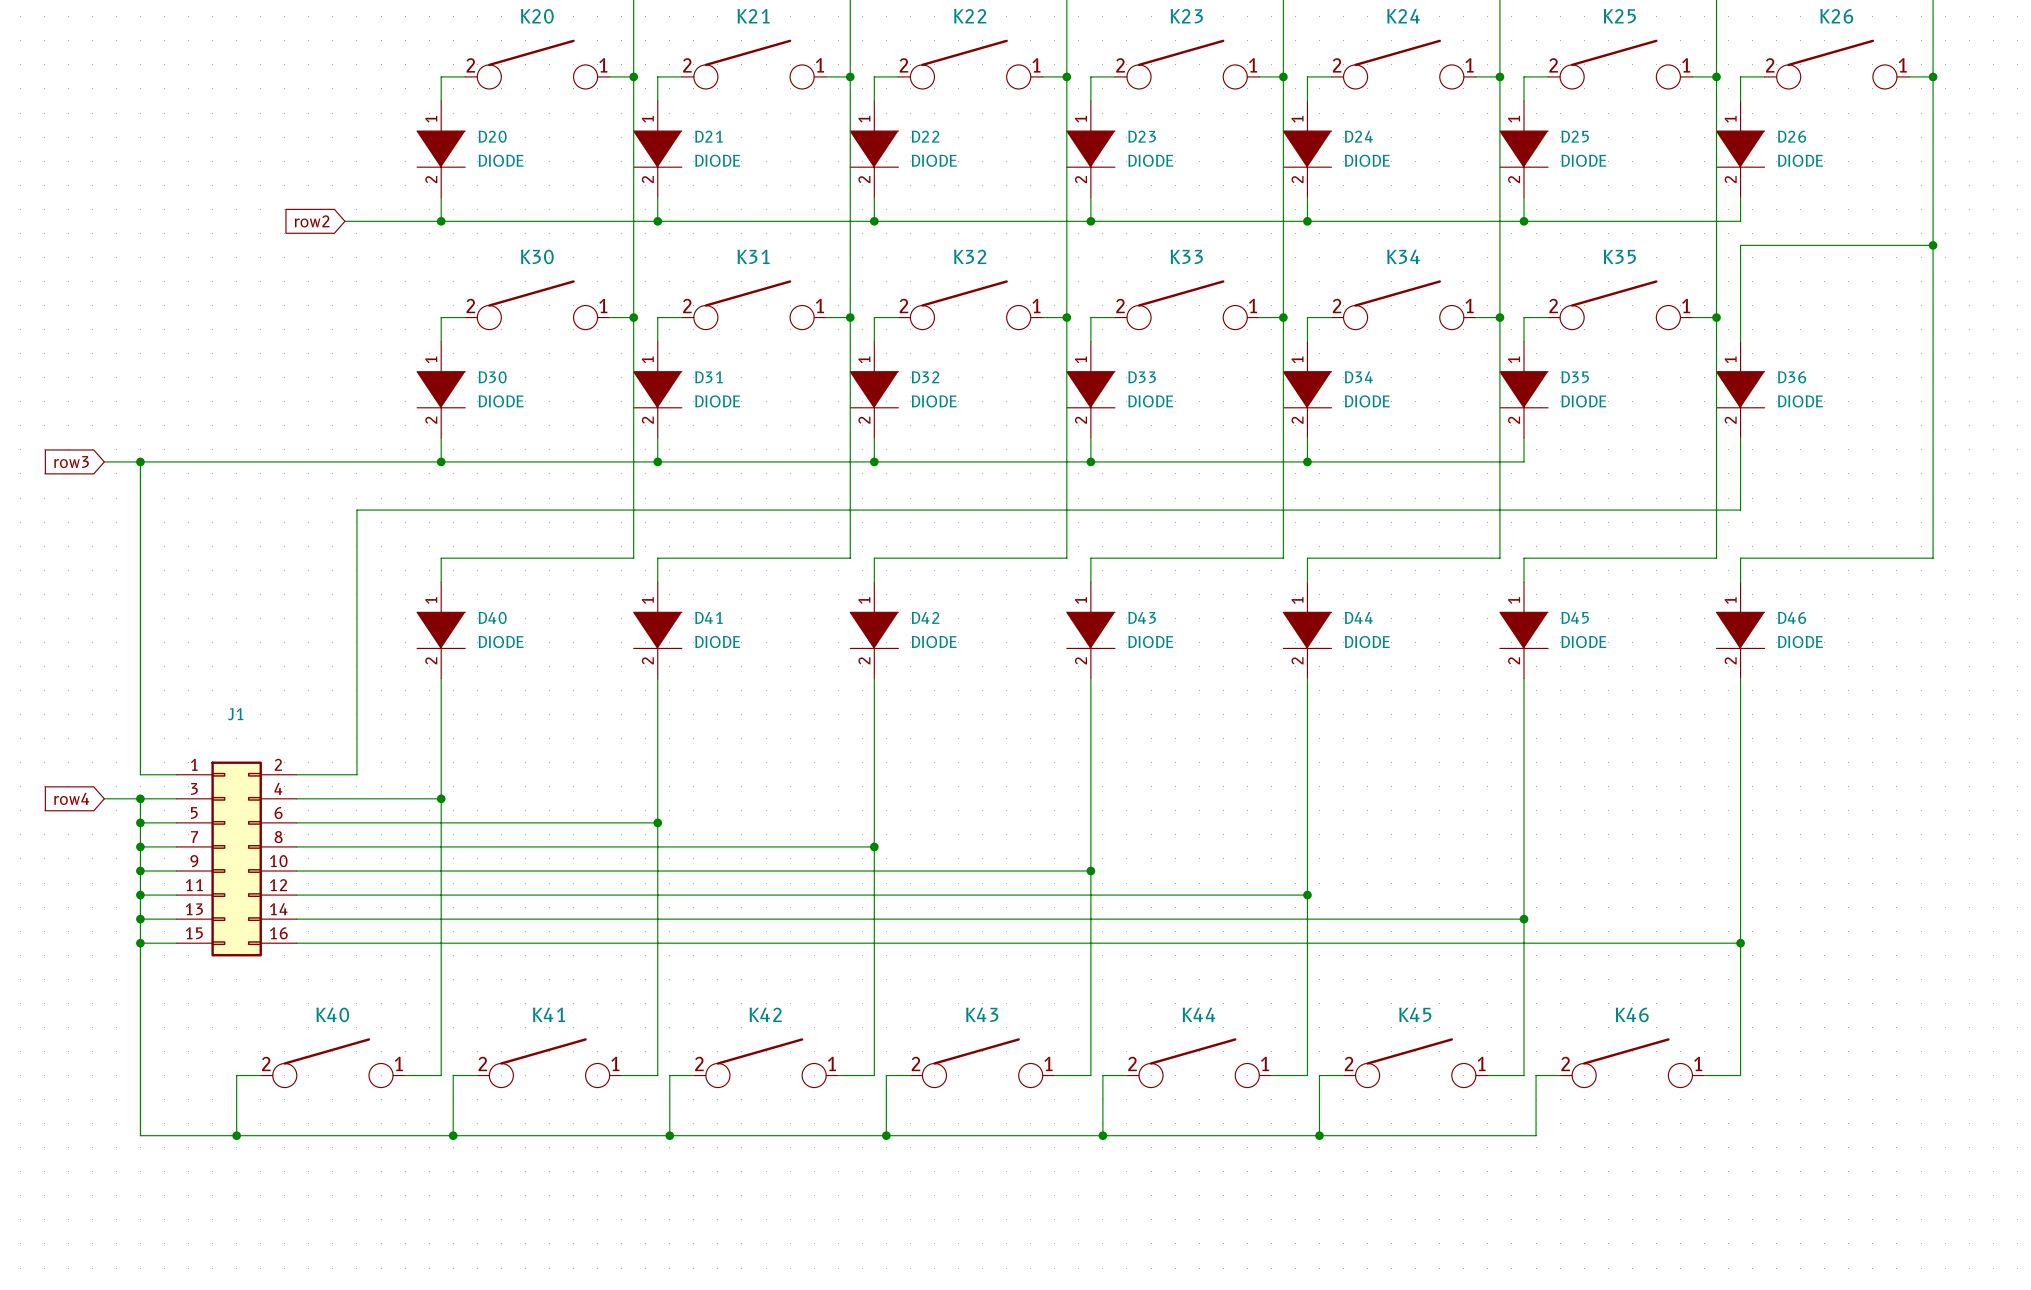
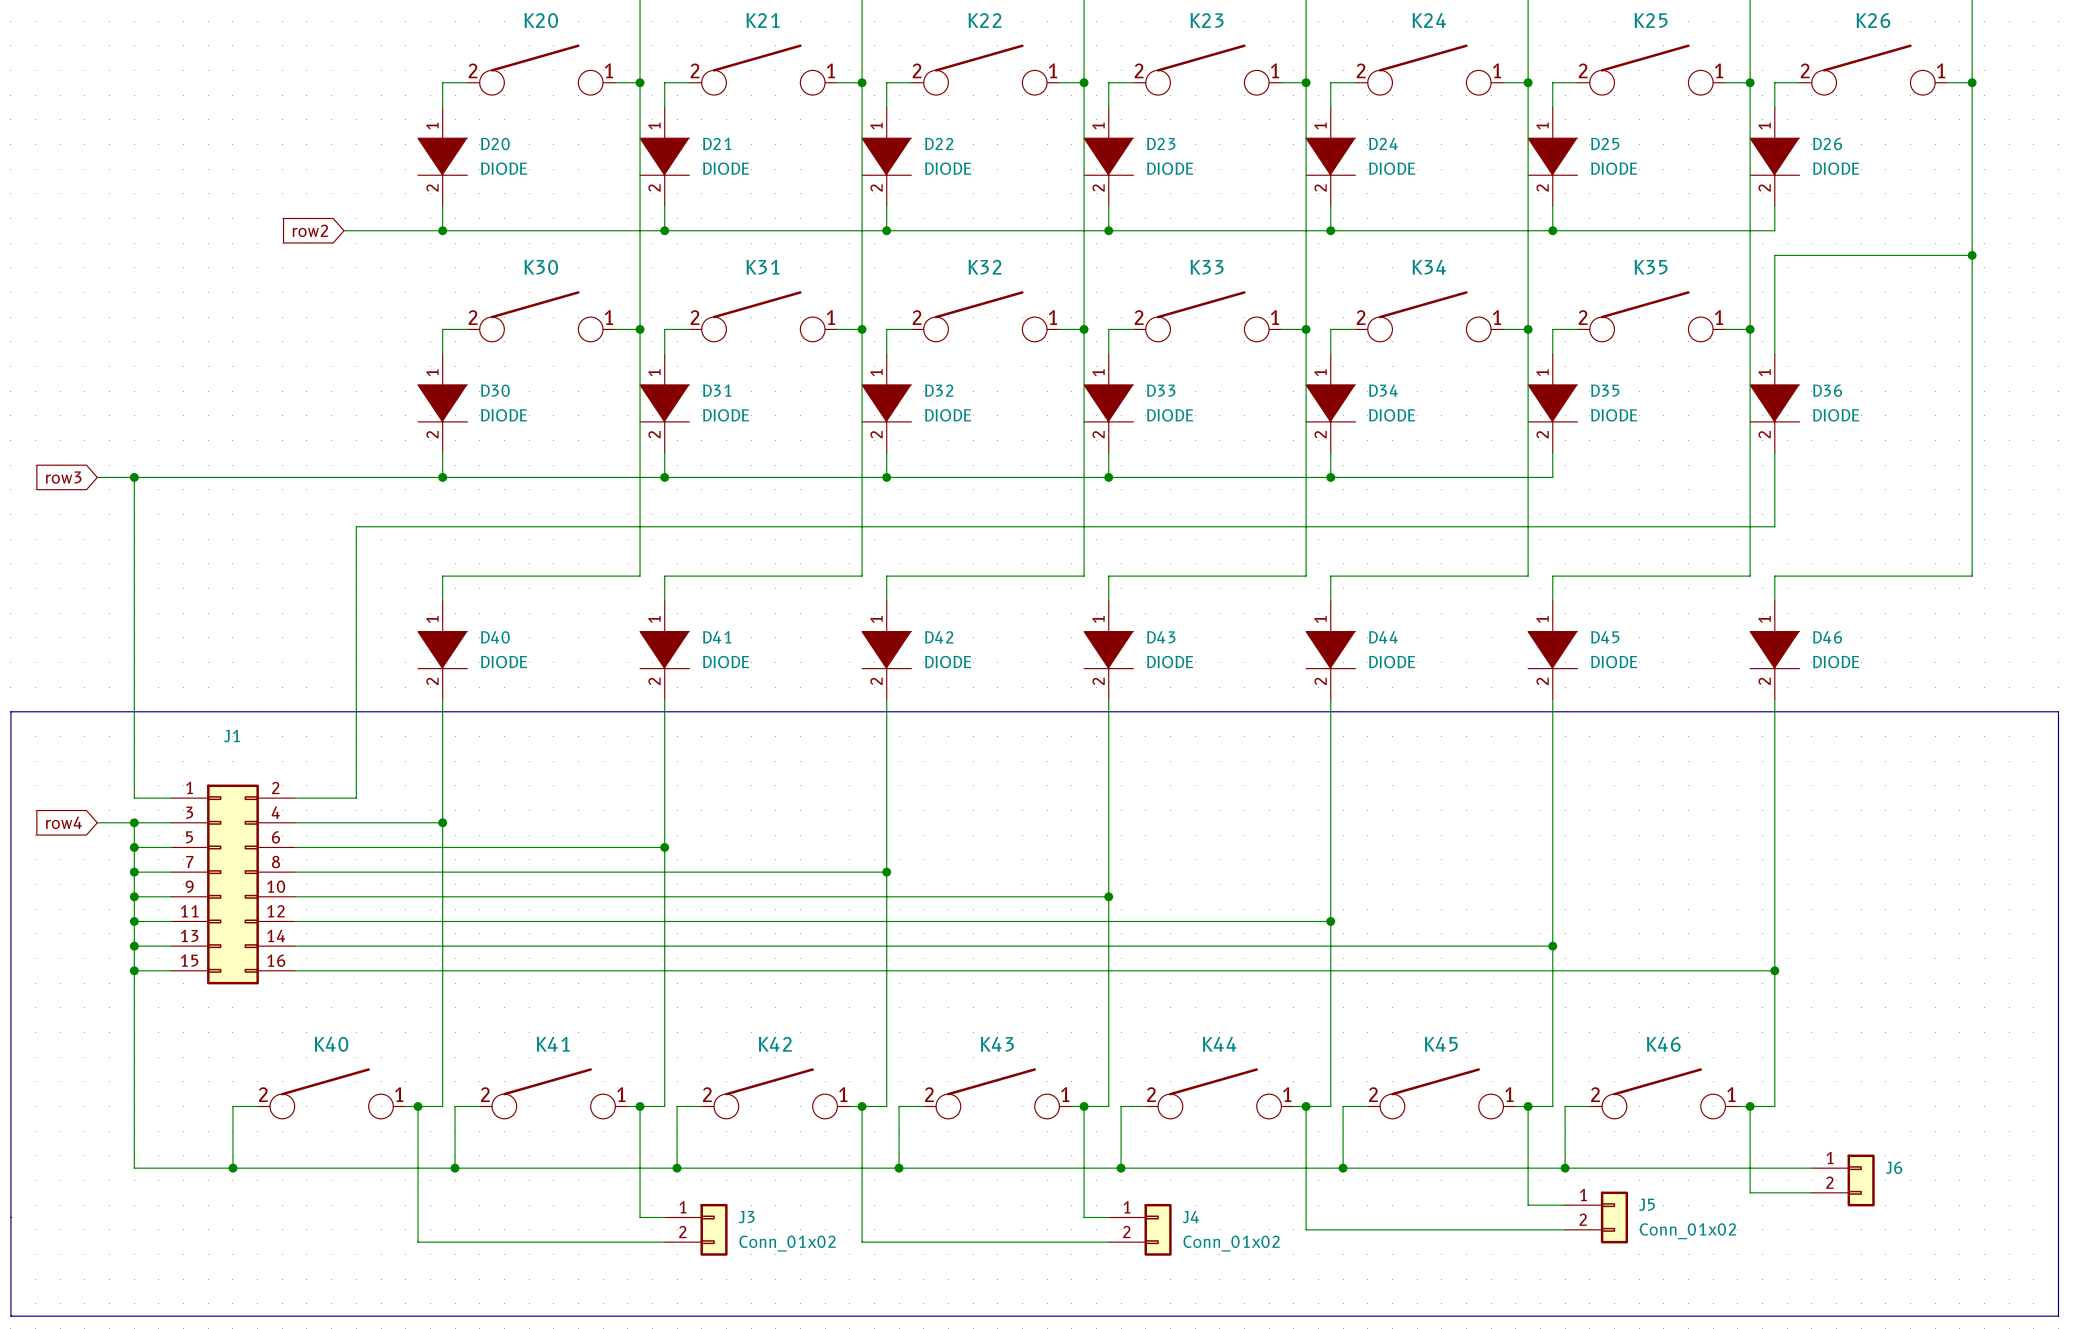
line: none -> (10, 711) (2058, 711) (2058, 1316) (10, 1316) (10, 711)
wire: none -> (418, 1106) (418, 1242) (664, 1242)
junction: none -> (418, 1106)
wire: none -> (640, 1106) (640, 1217) (664, 1217)
junction: none -> (640, 1106)
wire: none -> (862, 1106) (862, 1242) (1108, 1242)
junction: none -> (862, 1106)
wire: none -> (1084, 1106) (1084, 1217) (1108, 1217)
junction: none -> (1084, 1106)
wire: none -> (1306, 1106) (1306, 1229) (1565, 1229)
junction: none -> (1306, 1106)
wire: none -> (1528, 1106) (1528, 1205) (1565, 1205)
junction: none -> (1528, 1106)
wire: none -> (1750, 1106) (1750, 1192) (1811, 1192)
junction: none -> (1750, 1106)
wire: none -> (1565, 1168) (1811, 1168)
junction: none -> (1565, 1168)
J6: none -> (1843, 1180)
J5: none -> Conn_01x02 (1596, 1217)
J3: none -> Conn_01x02 (696, 1229)
J4: none -> Conn_01x02 (1140, 1229)

